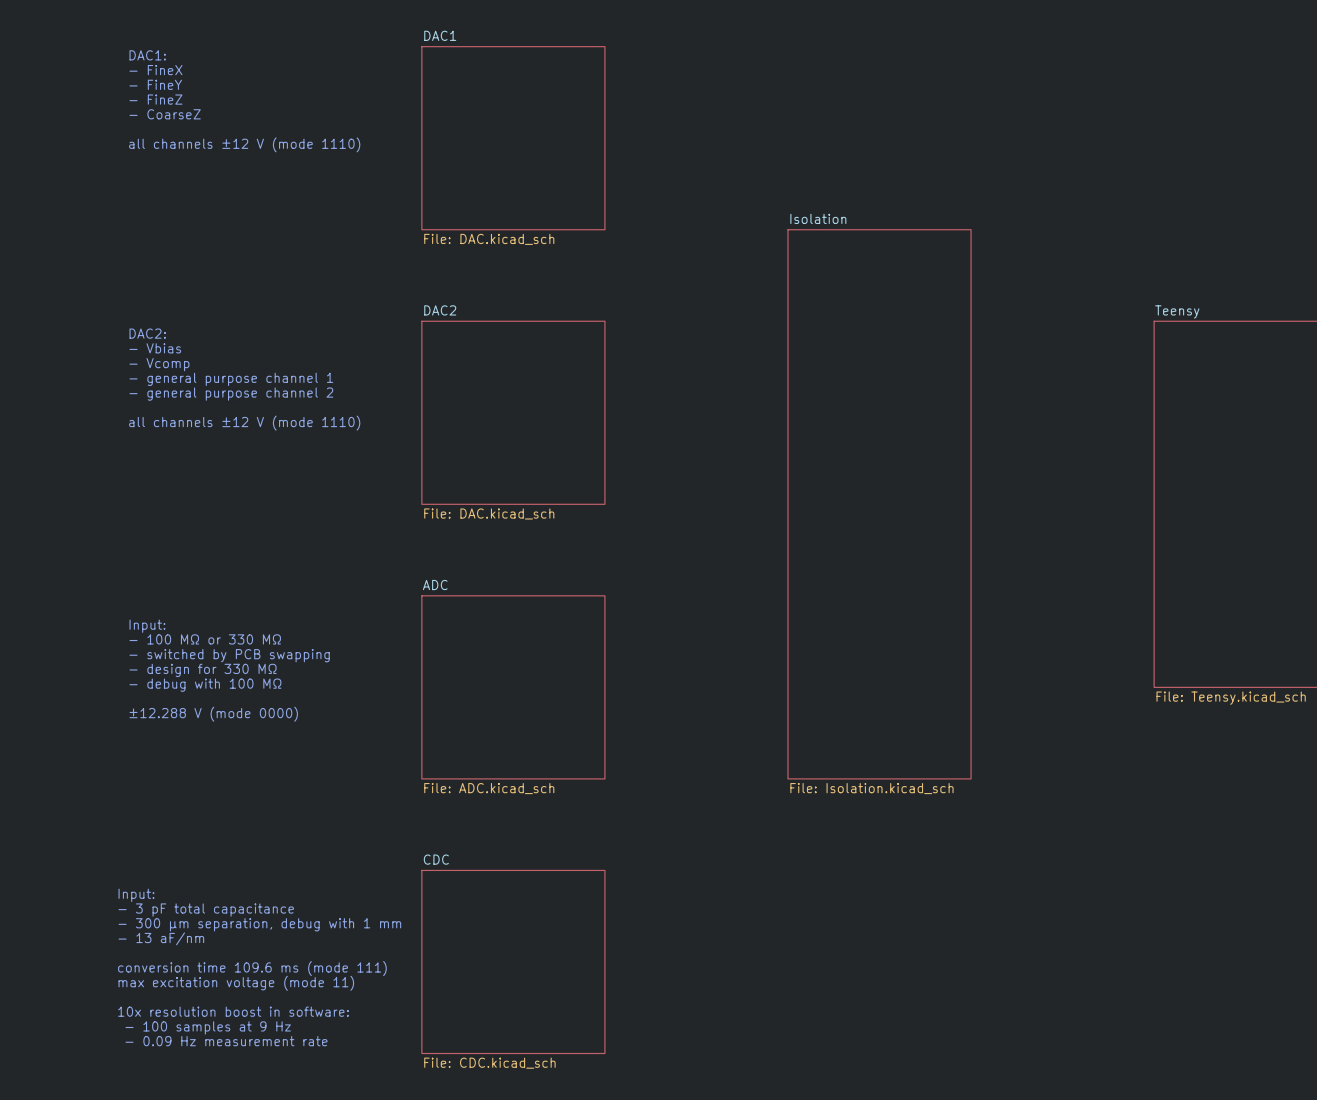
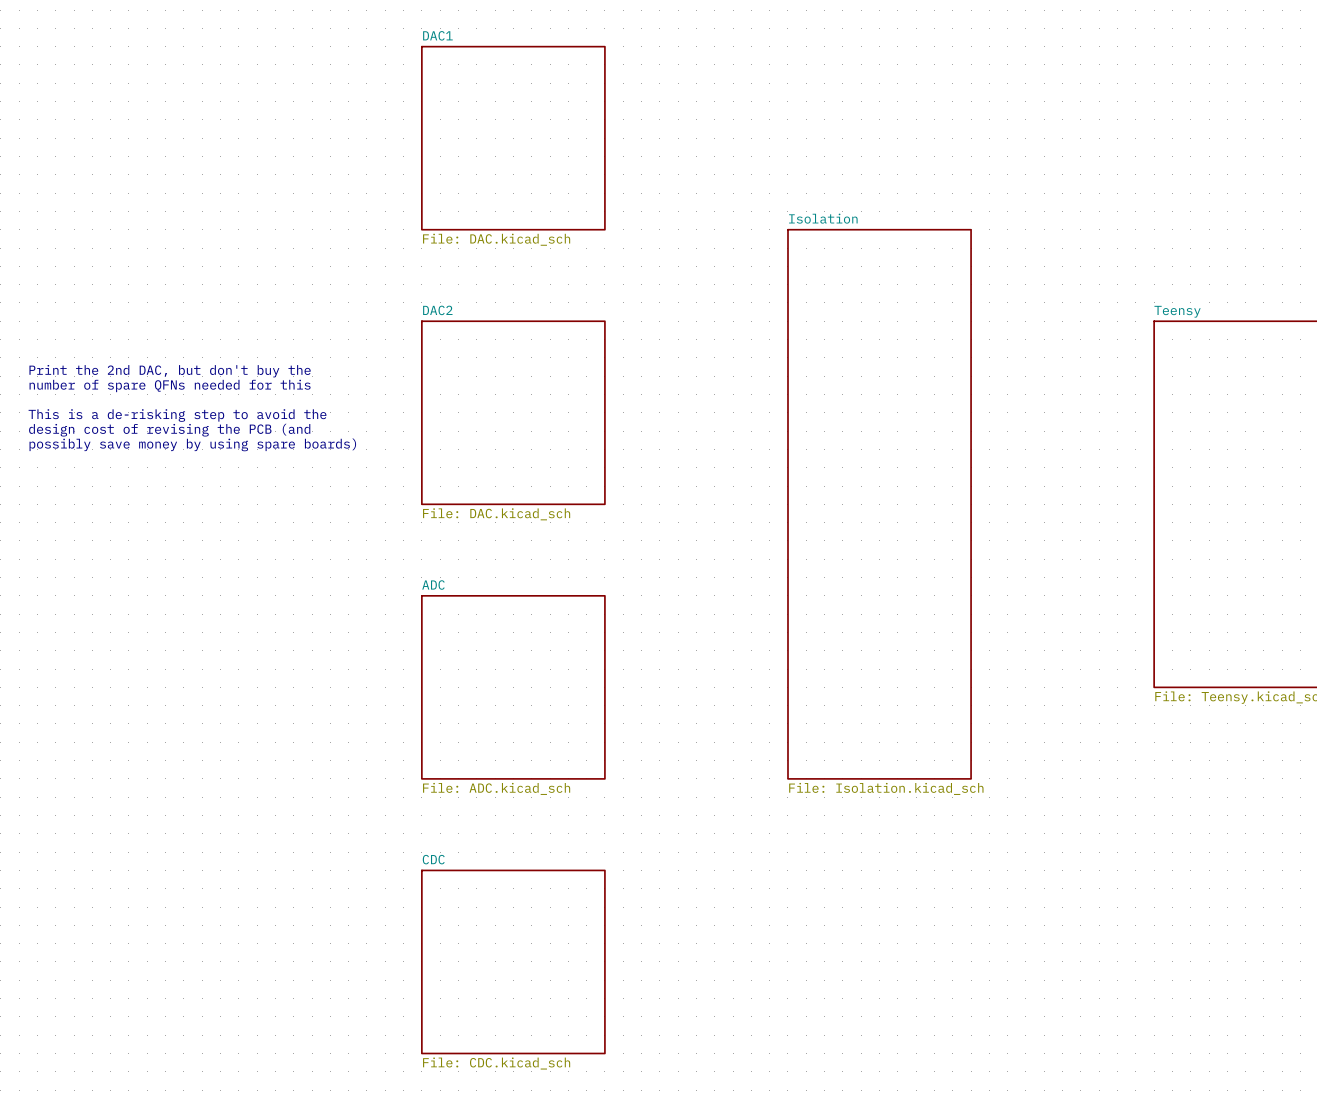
text: DAC1: (147, 55) -> none
text: - FineX (155, 70) -> none
text: - FineY (155, 84) -> none
text: - FineZ (155, 99) -> none
text: - CoarseZ (165, 114) -> none
text: all channels ±12 V (mode 1110) (244, 144) -> none
text: DAC2: (147, 333) -> none
text: - Vbias (155, 348) -> none
text: - Vcomp (159, 364) -> none
text: none -> Print the 2nd DAC, but don't buy the (170, 371)
text: - general purpose channel 1 (231, 379) -> none
text: none -> number of spare QFNs needed for this (170, 385)
text: - general purpose channel 2 (231, 394) -> none
text: none -> This is a de-risking step to avoid the (177, 415)
text: all channels ±12 V (mode 1110) (244, 423) -> none
text: none -> design cost of revising the PCB (and (169, 430)
text: none -> possibly save money by using spare boards) (192, 444)
text: Input: (147, 626) -> none
text: - 100 MΩ or 330 MΩ (205, 639) -> none
text: - switched by PCB swapping (229, 655) -> none
text: - design for 330 MΩ (203, 670) -> none
text: - debug with 100 MΩ (205, 685) -> none
text: ±12.288 V (mode 0000) (213, 714) -> none
text: Input: (136, 895) -> none
text: - 3 pF total capacitance (206, 910) -> none
text: - 300 μm separation, debug with 1 mm (259, 924) -> none
text: - 13 aF/nm (161, 938) -> none
text: conversion time 109.6 ms (mode 111) (252, 968) -> none
text: max excitation voltage (mode 11) (236, 983) -> none
text: 10x resolution boost in software: (233, 1011) -> none
text: - 100 samples at 9 Hz (208, 1027) -> none
text: - 0.09 Hz measurement rate (226, 1041) -> none

